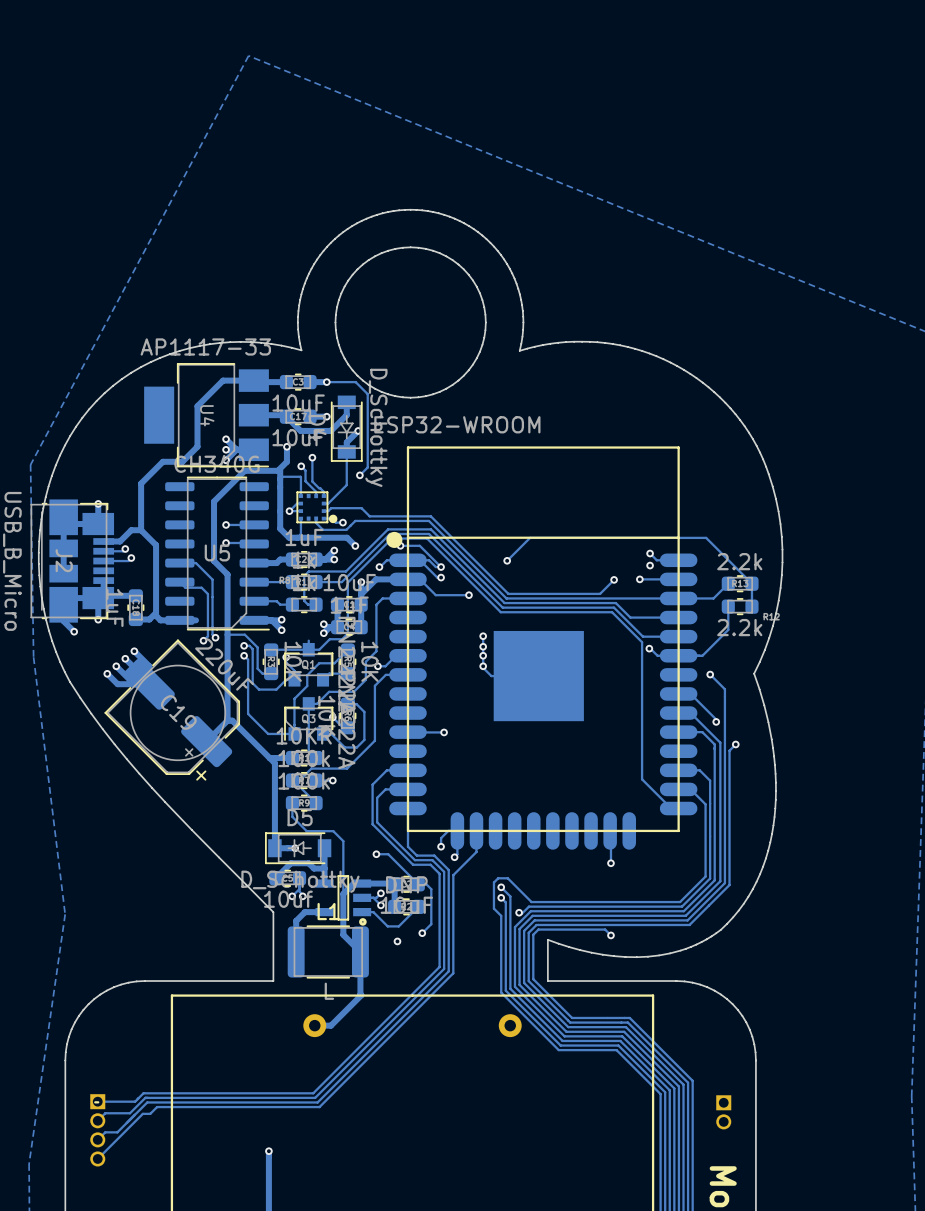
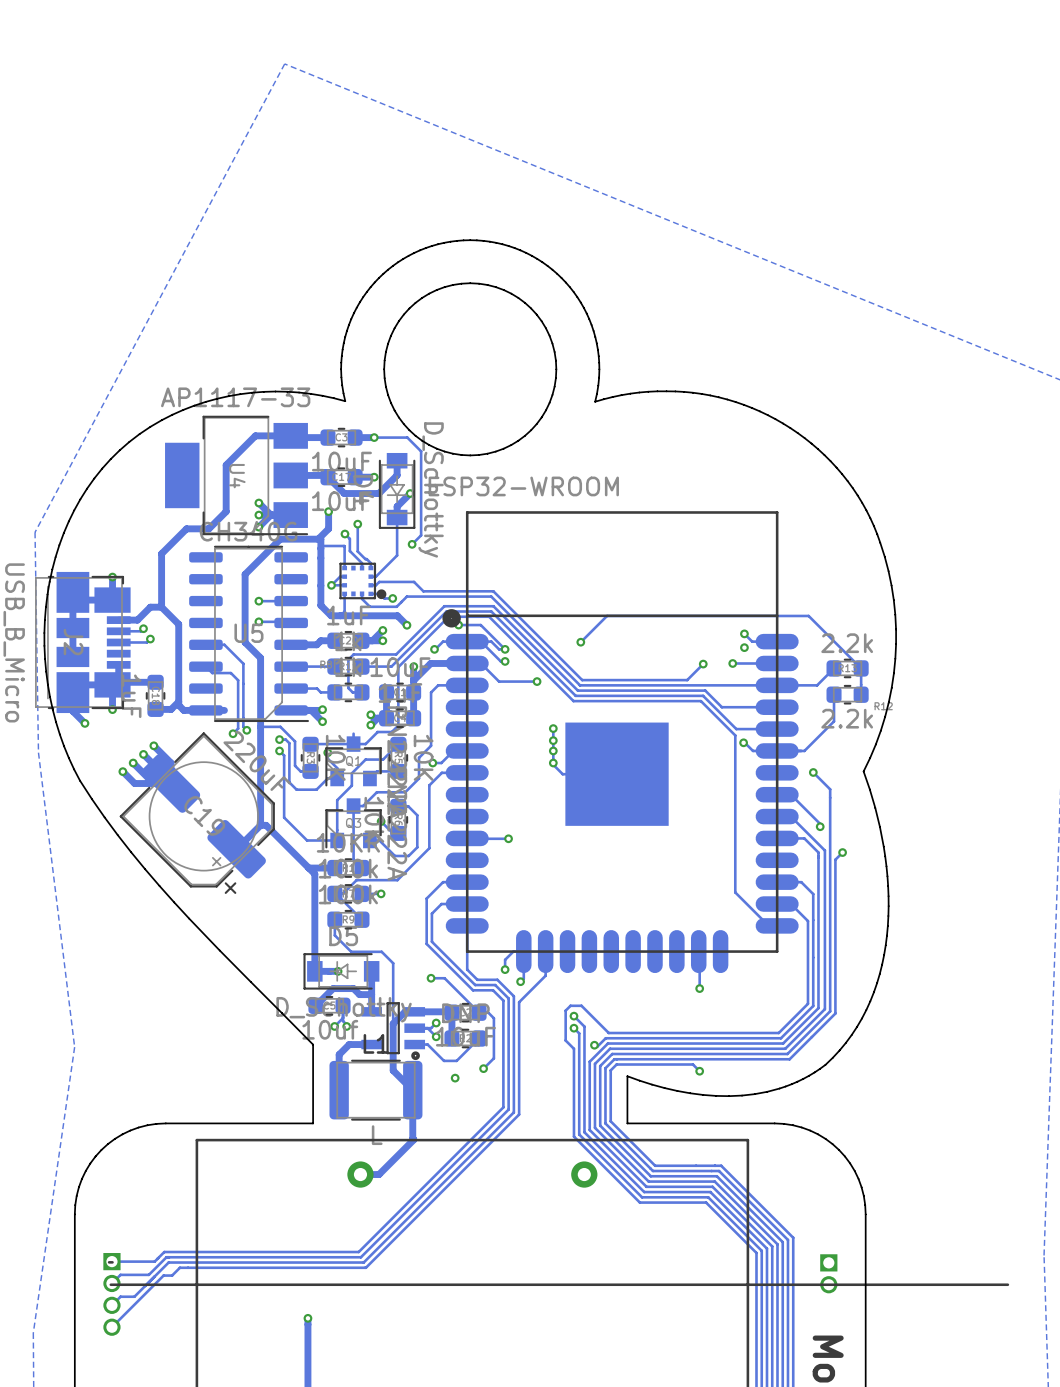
line: none -> (1007, 1284) (110, 1284)

